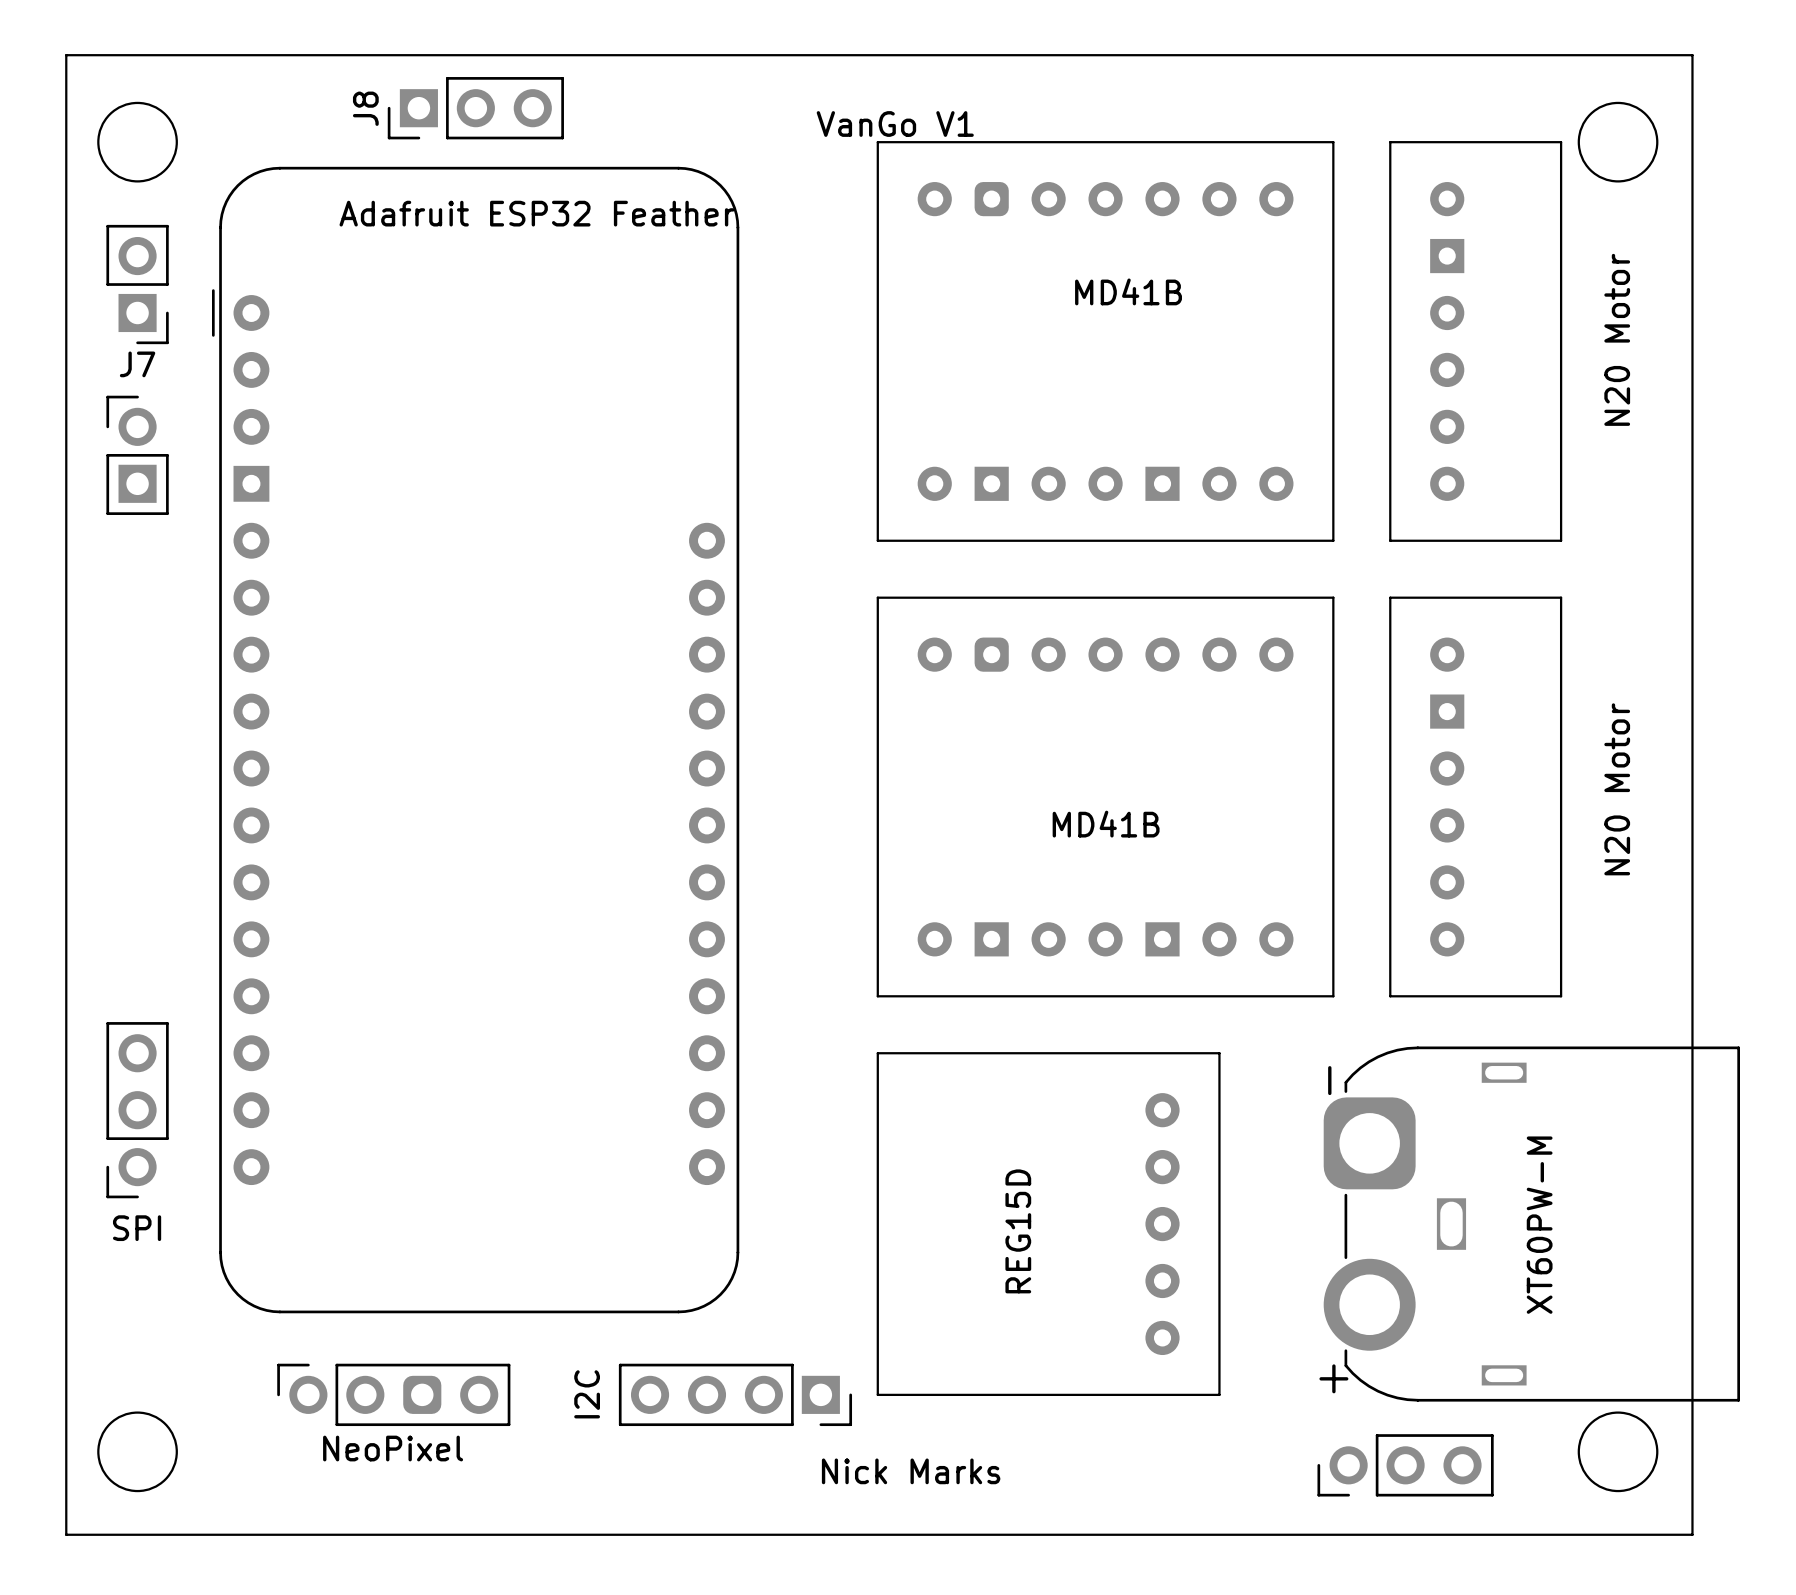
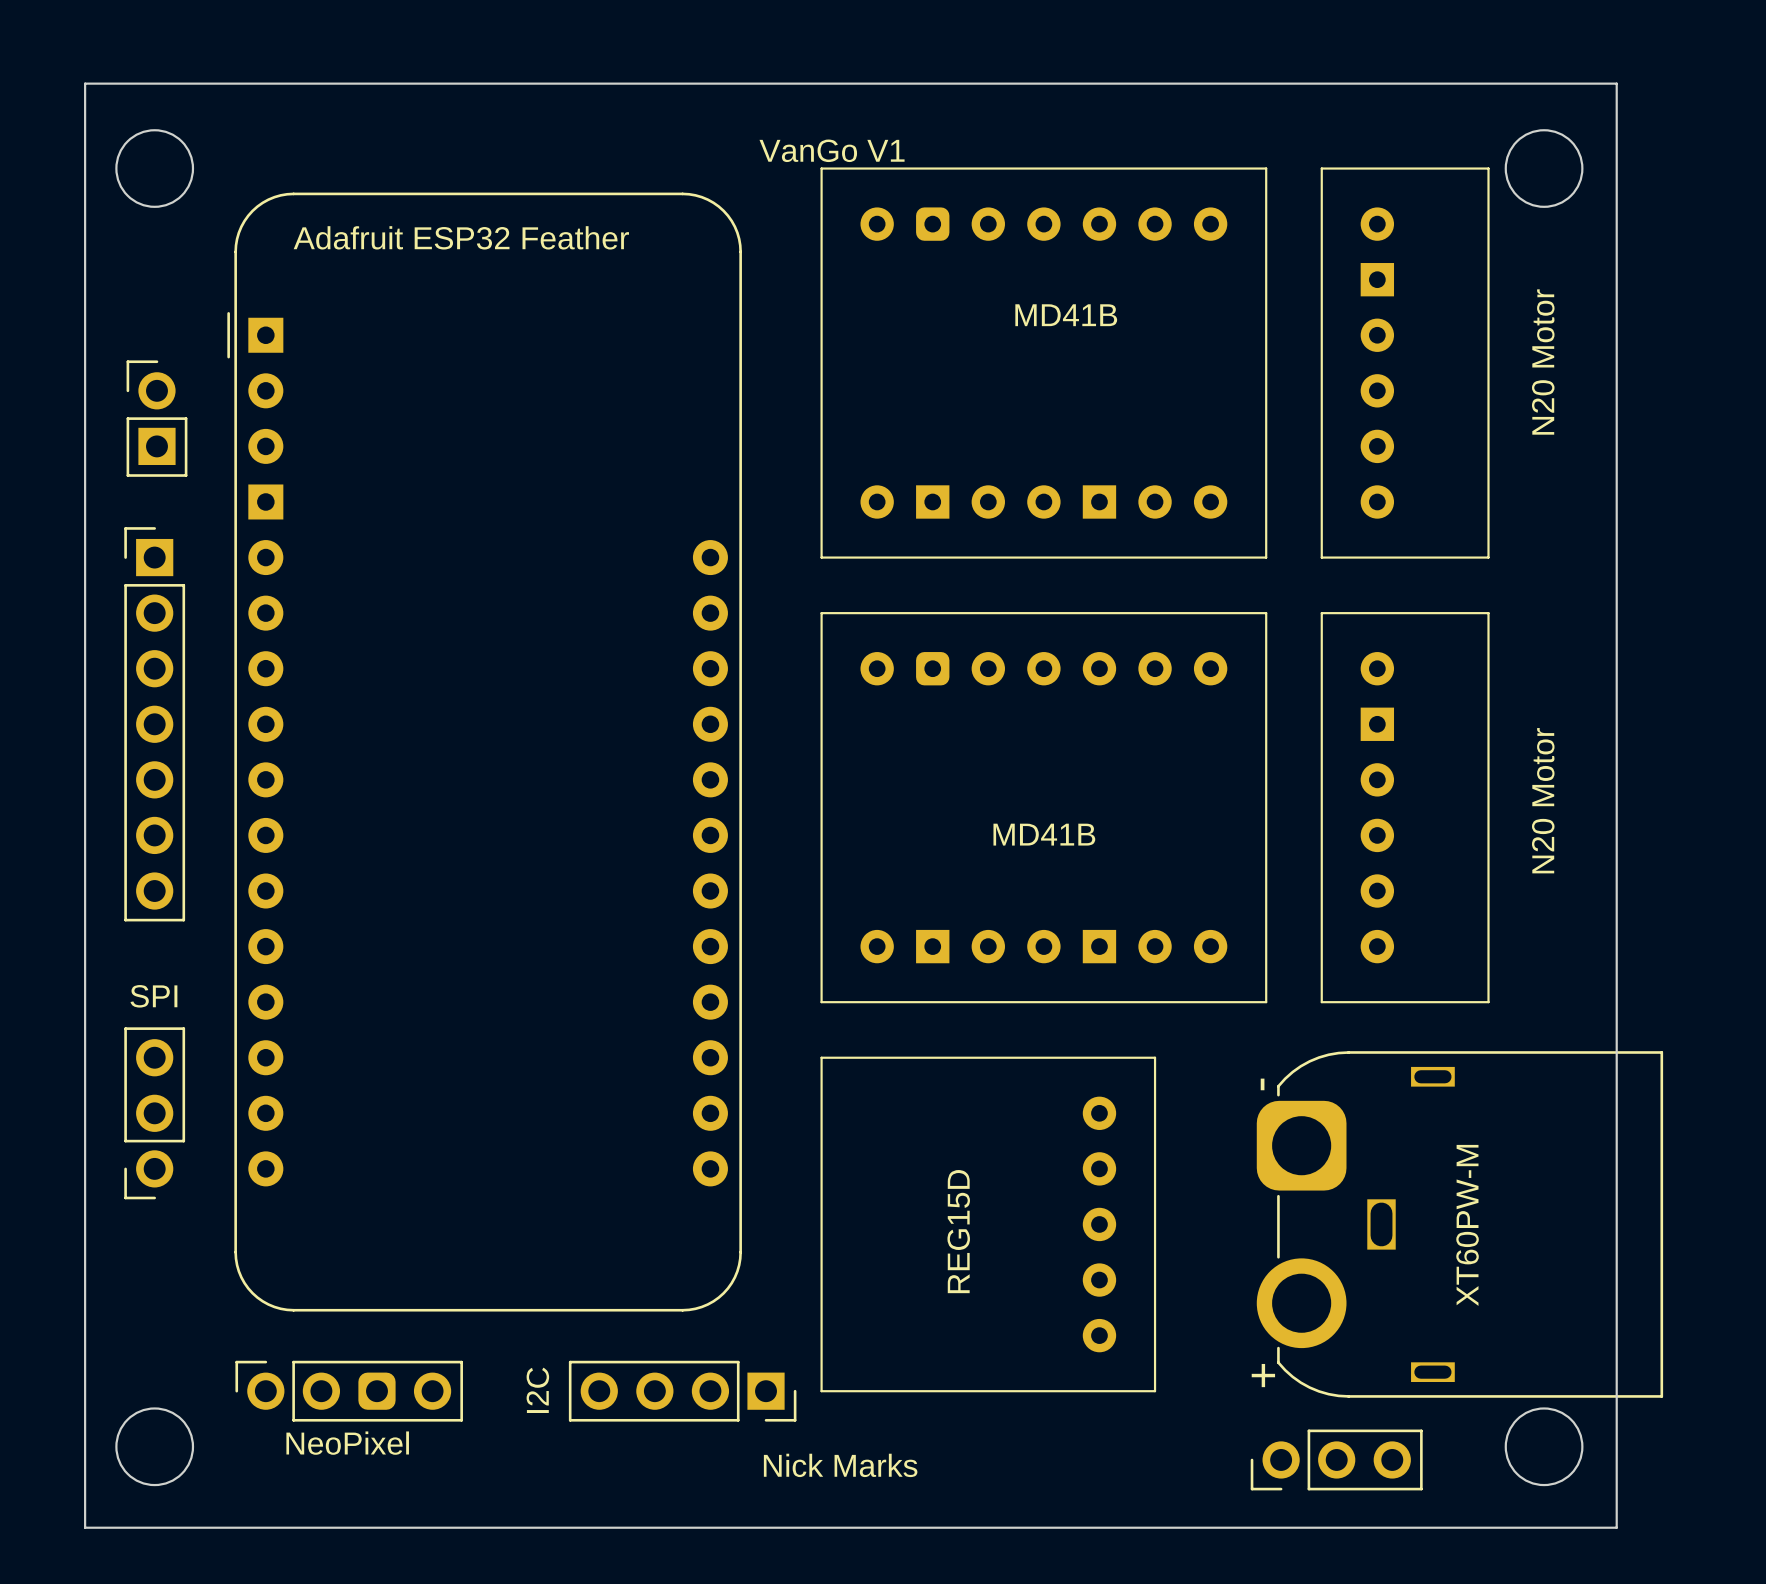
board edge: (123, 55) (66, 55) (66, 1534) (123, 1534) -> (85, 83) (85, 1527)
J8: (475, 108) -> none
round board edge position: (137, 142) -> (154, 168)
J7: (137, 284) -> none
part position: (137, 455) -> (156, 418)
part: none -> (154, 724)
part: (475, 740) -> none
part: none -> (484, 752)
part position: (137, 1110) -> (154, 1113)
part value position: SPI (137, 1228) -> SPI (153, 996)
round board edge position: (137, 1451) -> (154, 1446)

